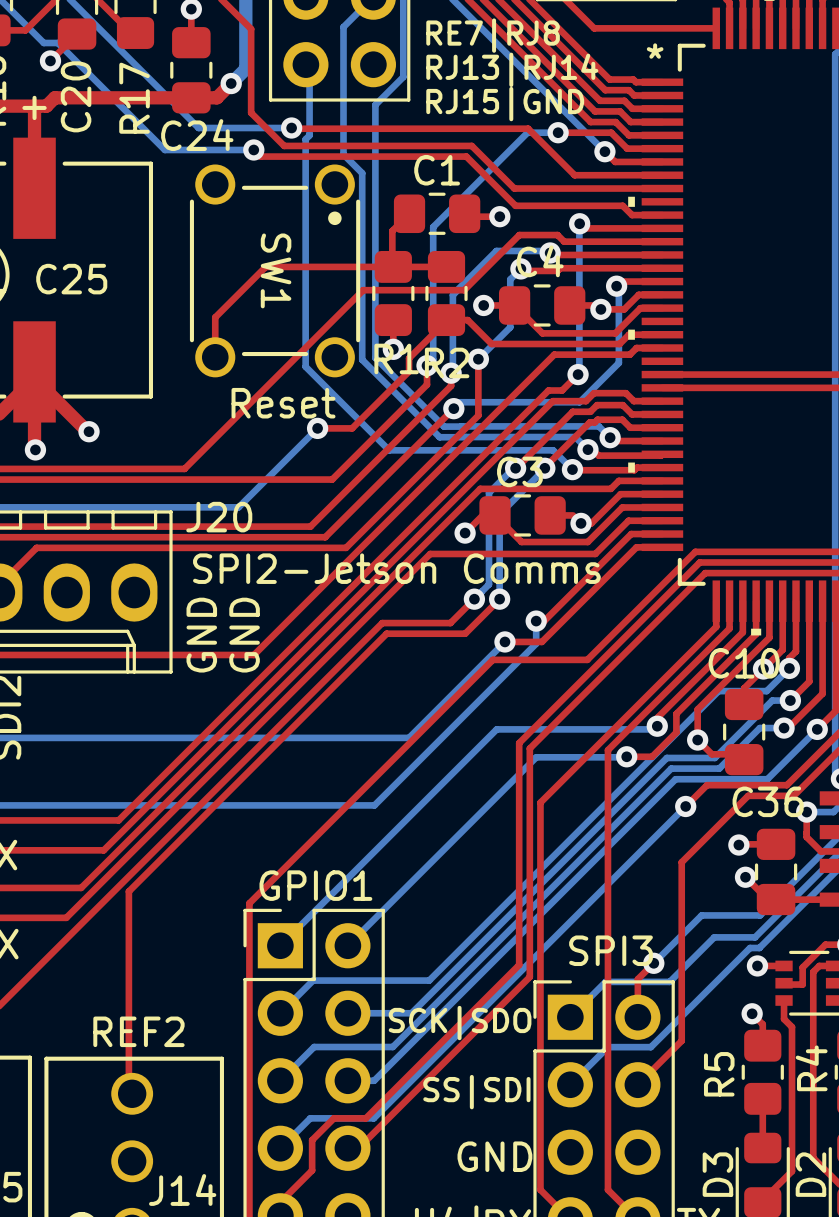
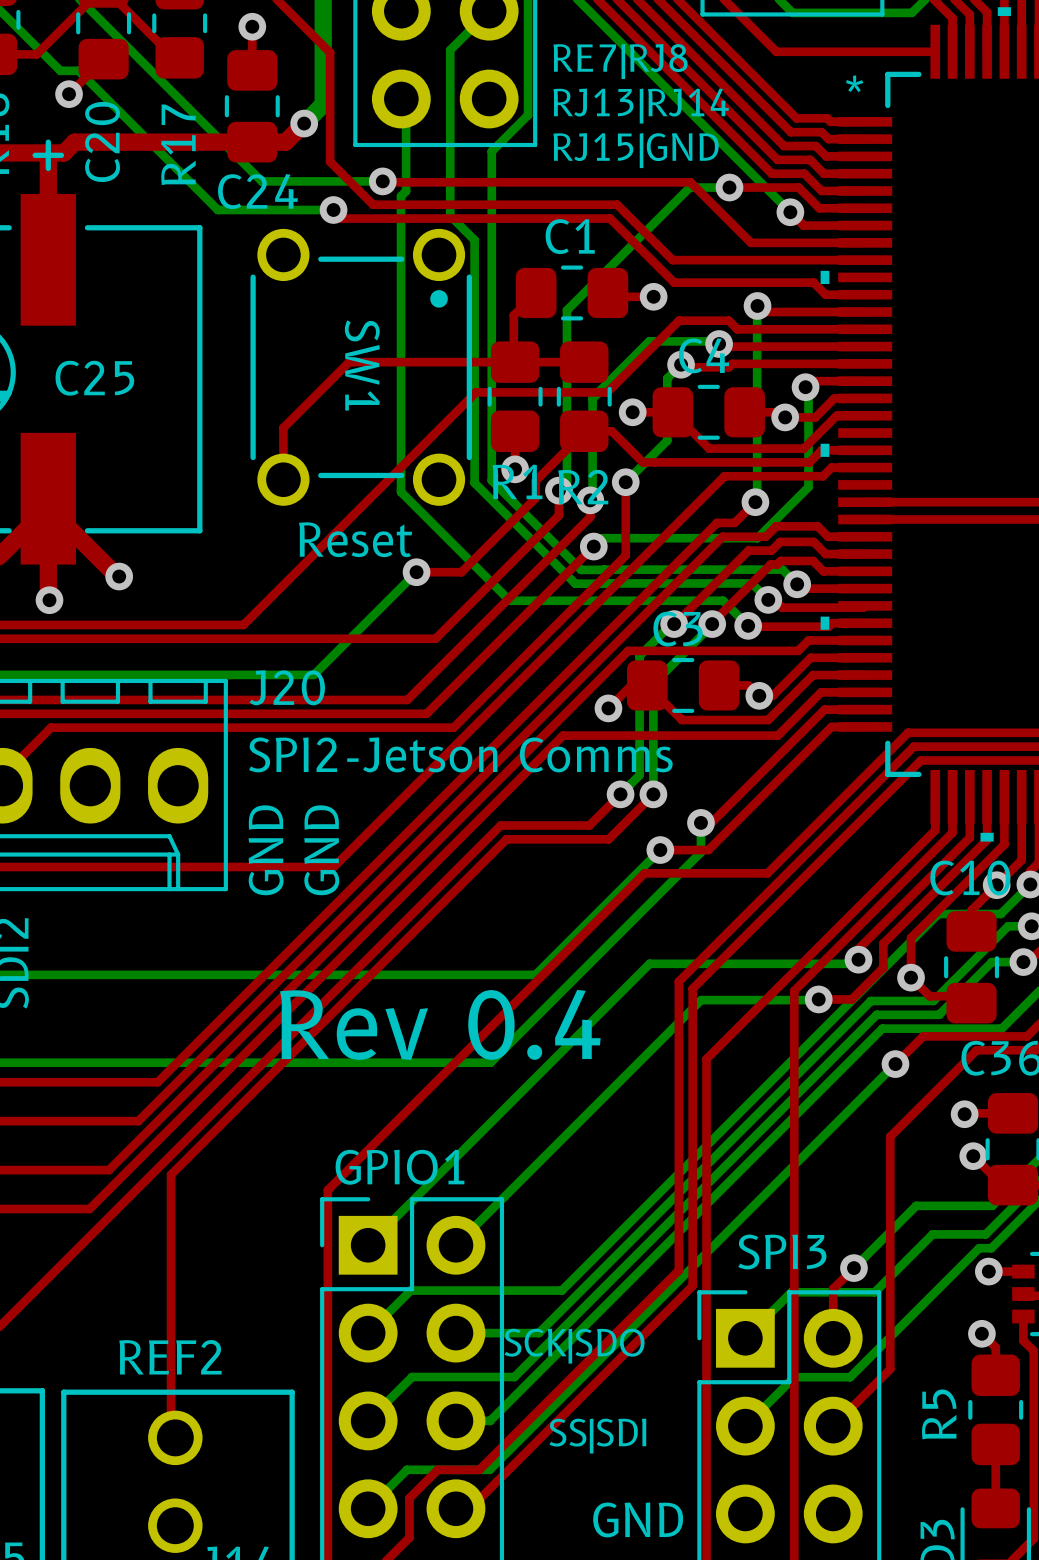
text: none -> Rev 0.4 (440, 1024)

